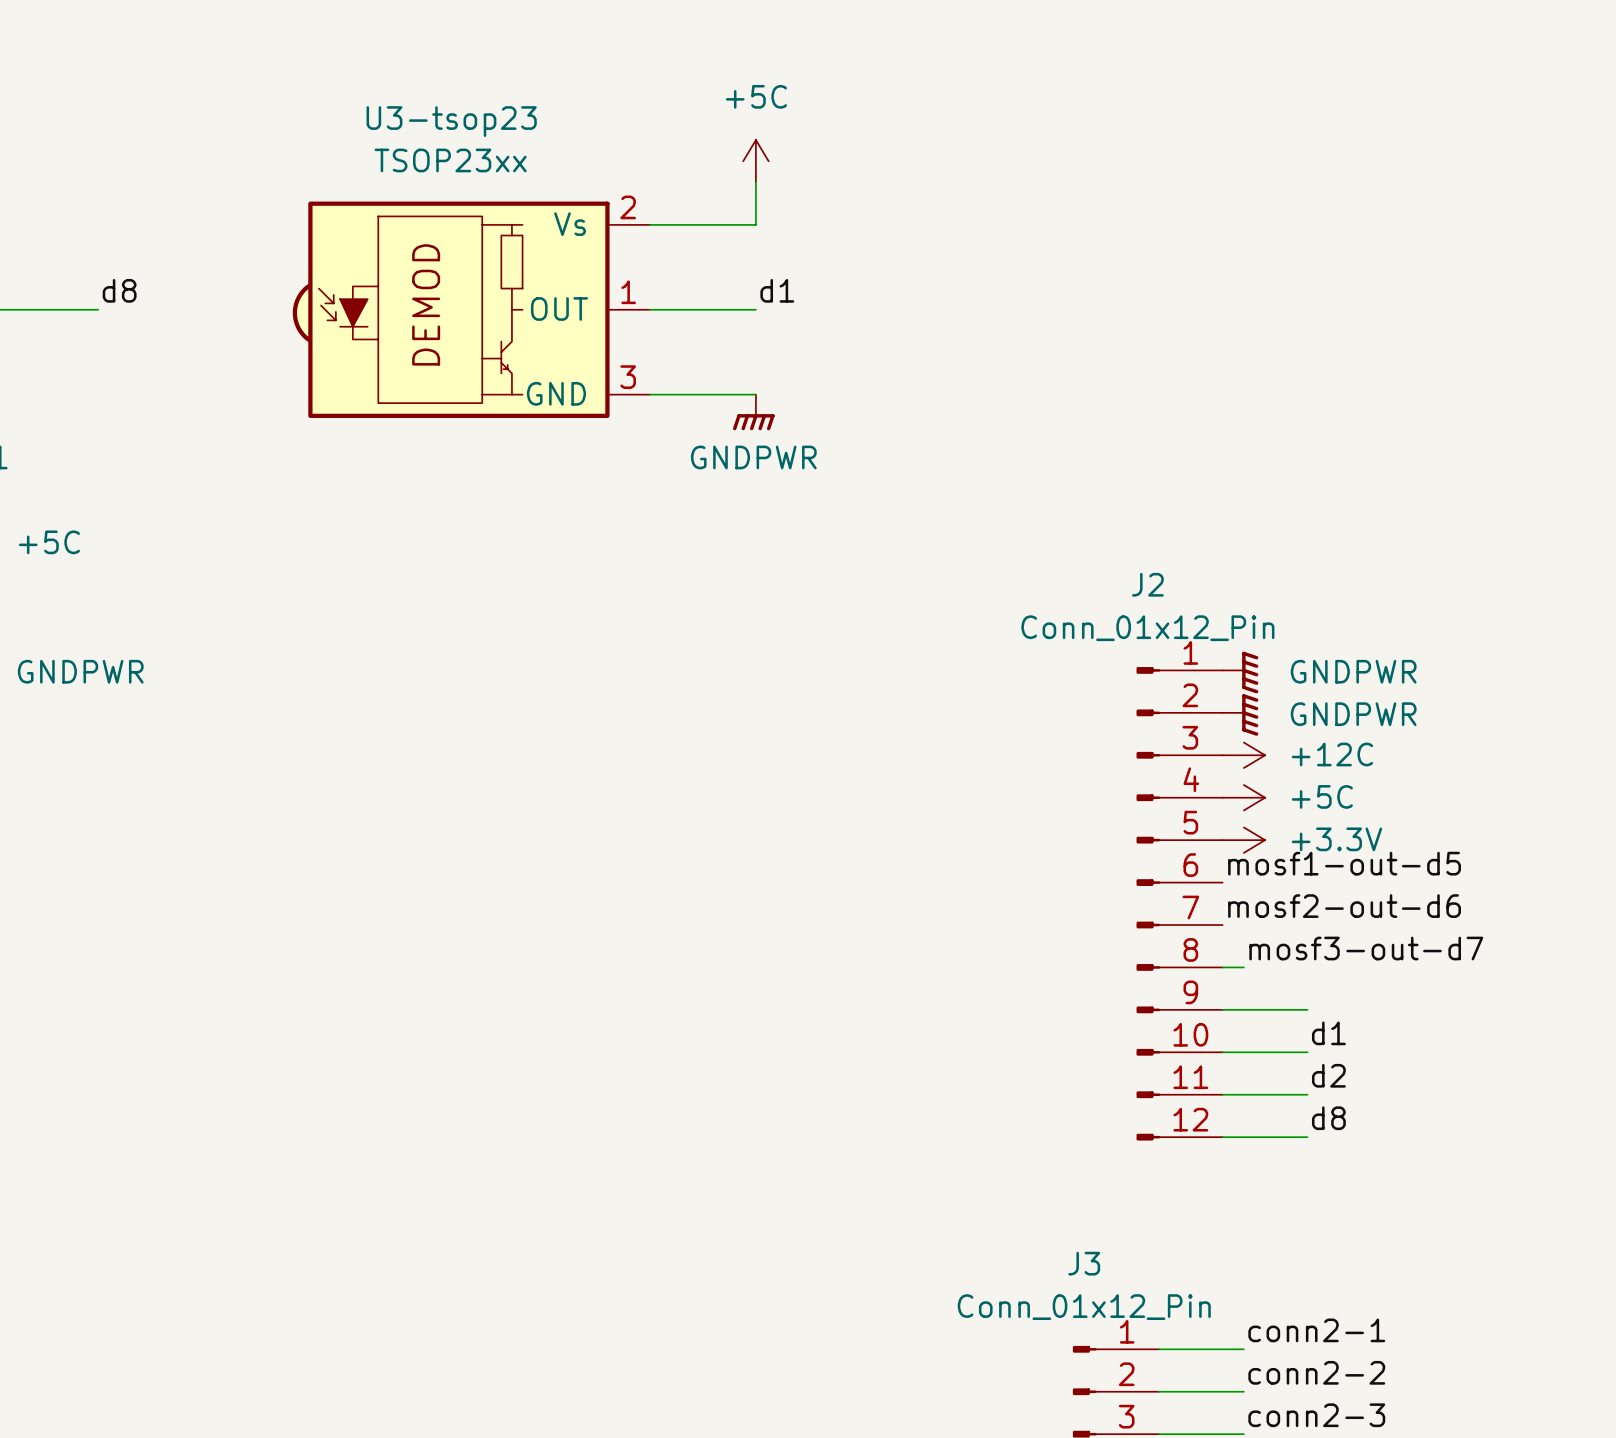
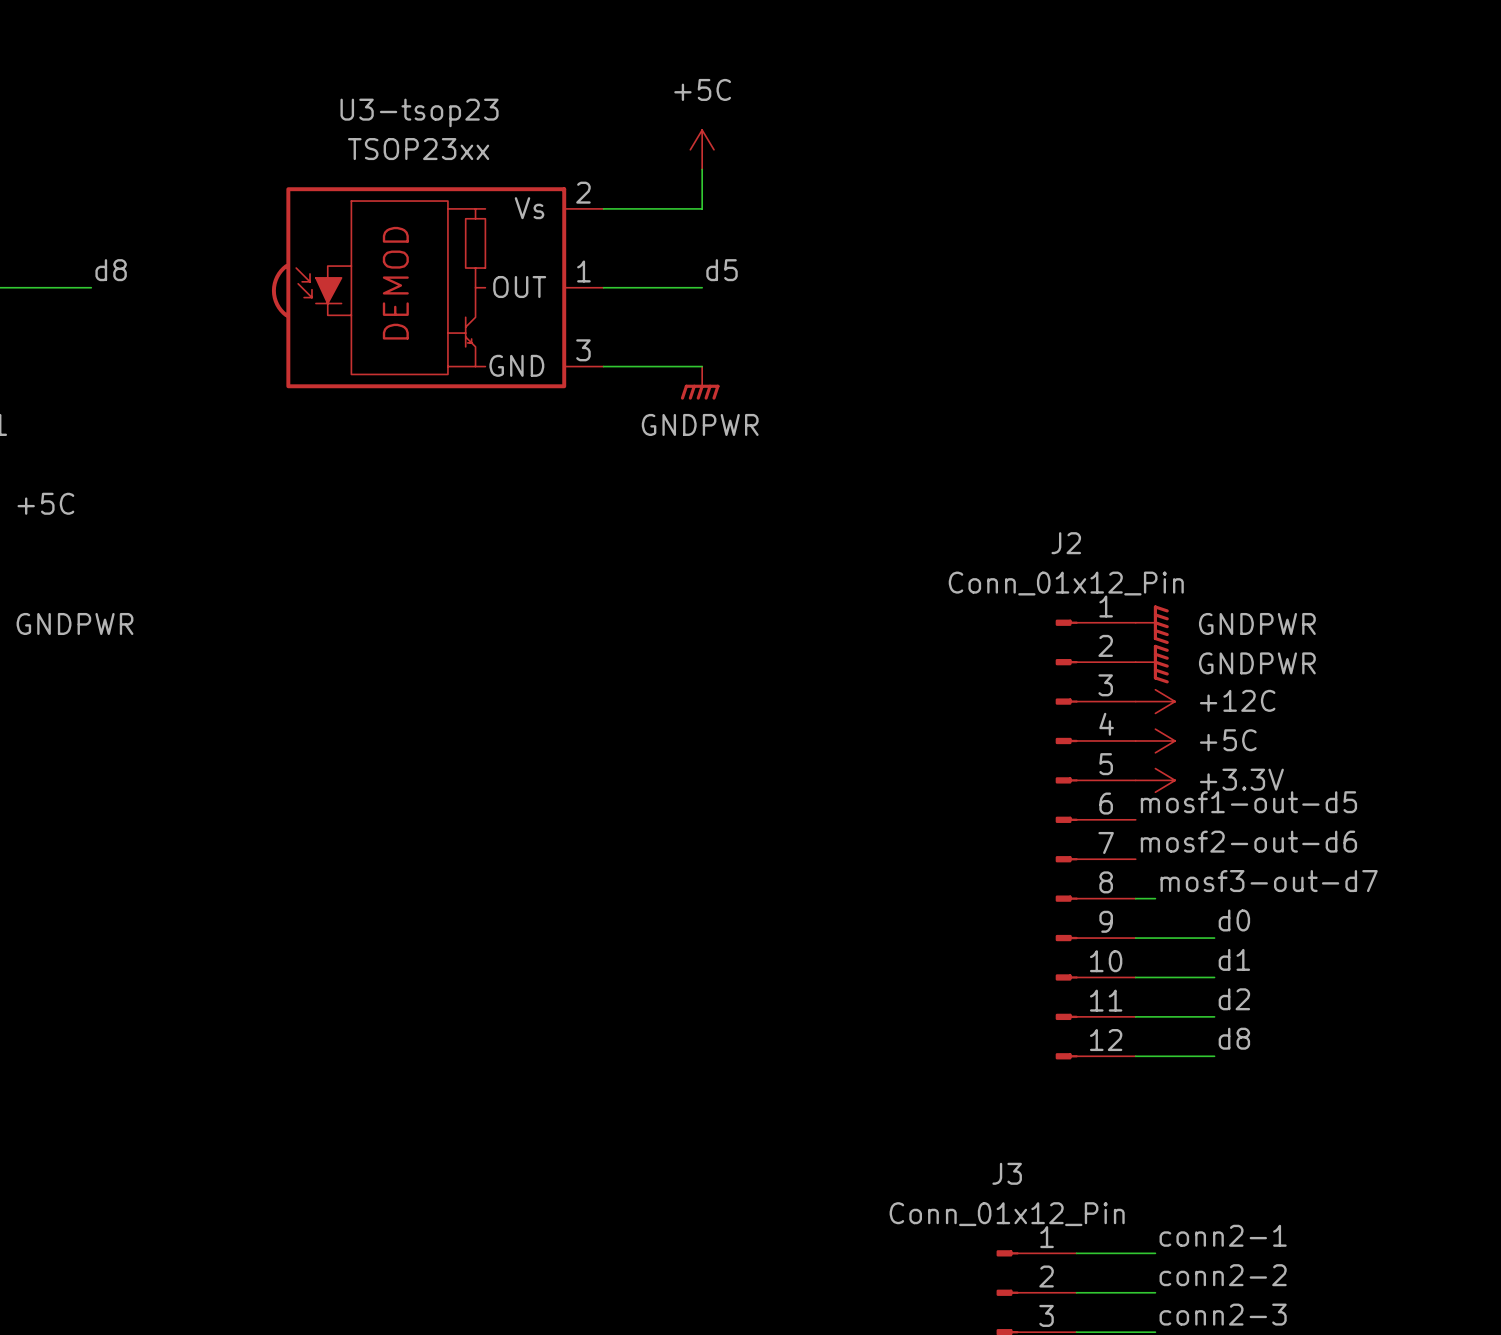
label: d1 (777, 290) -> d5 (722, 270)
label: none -> d0 (1234, 920)

